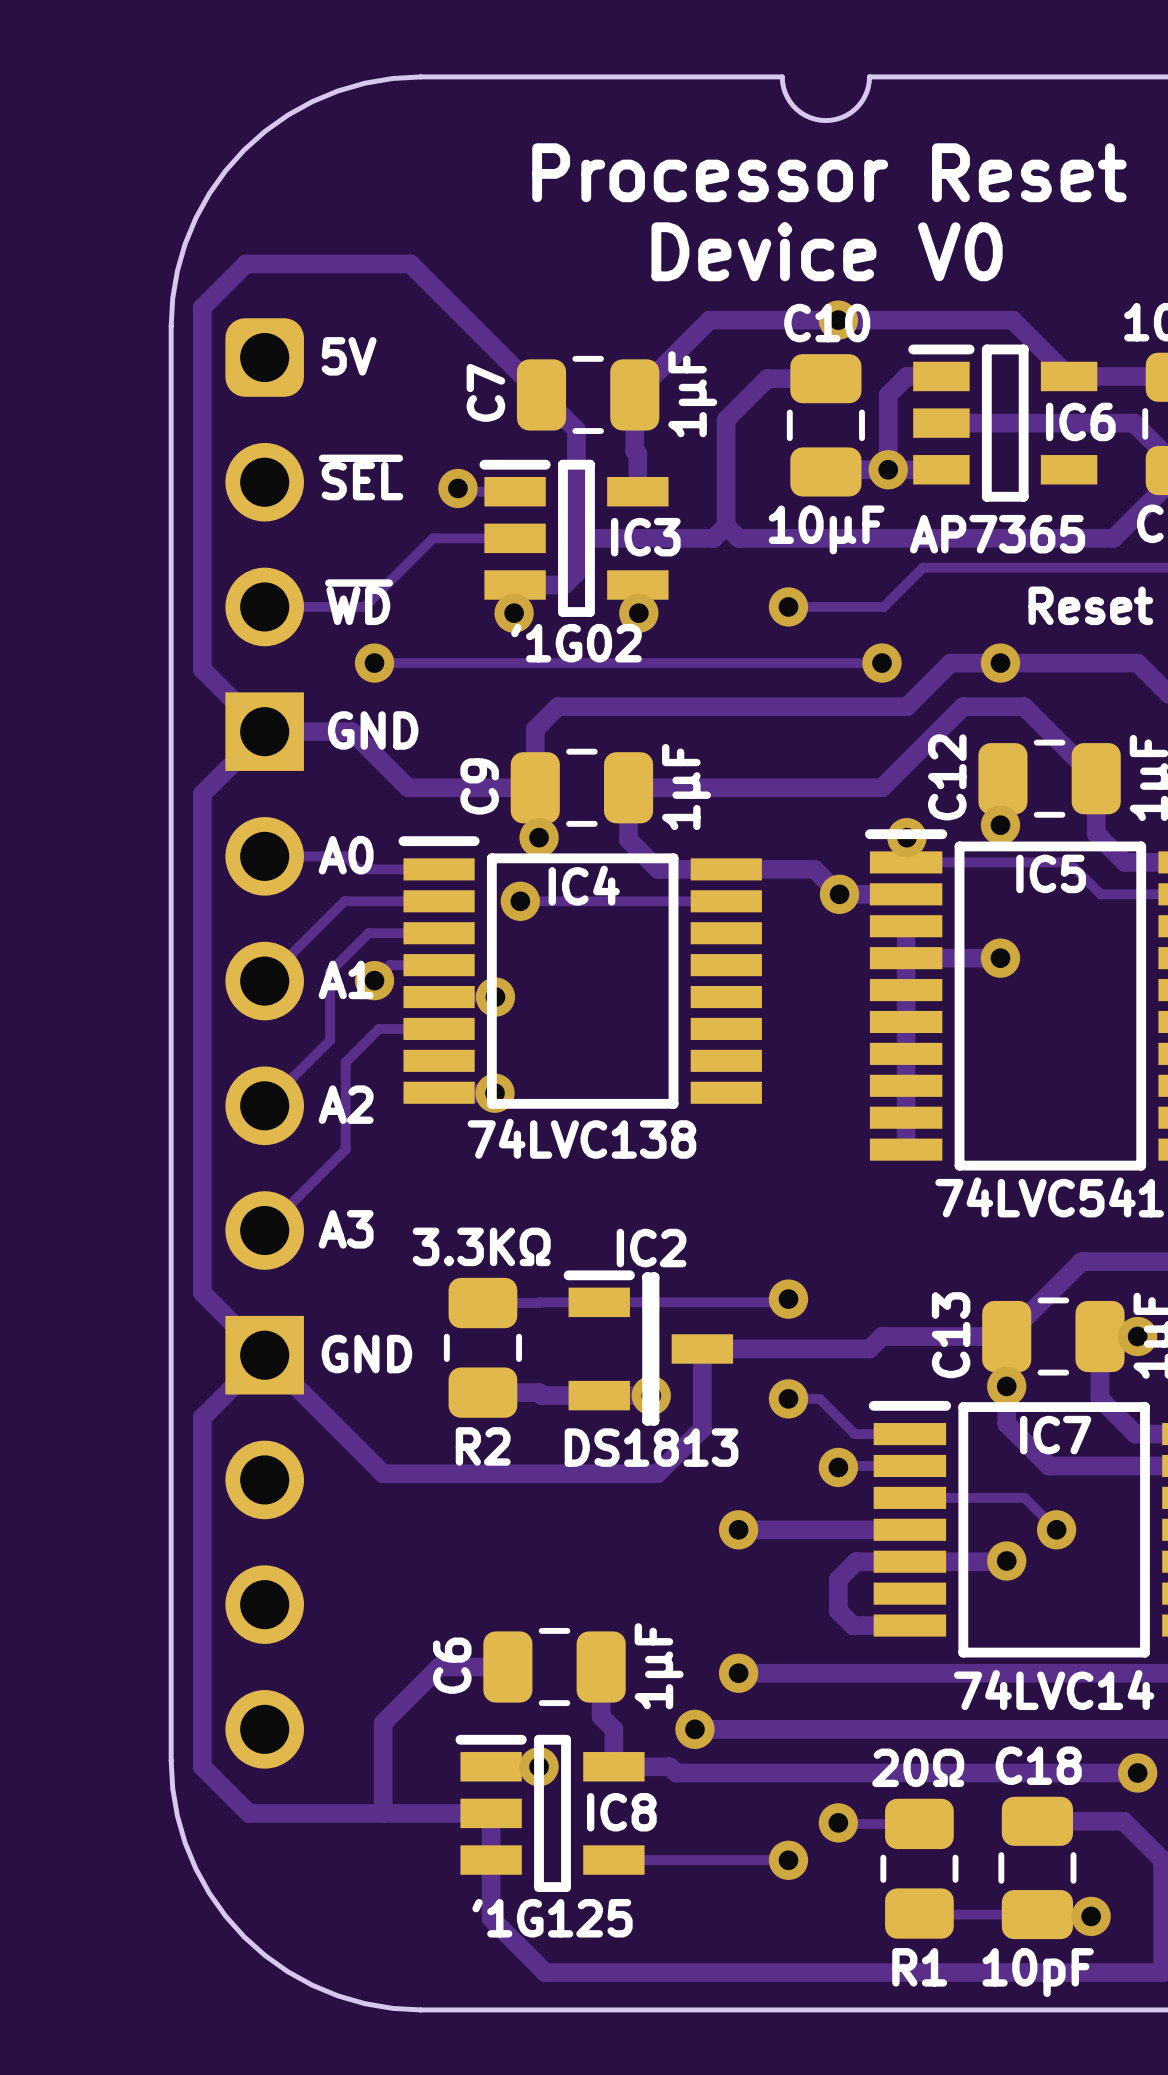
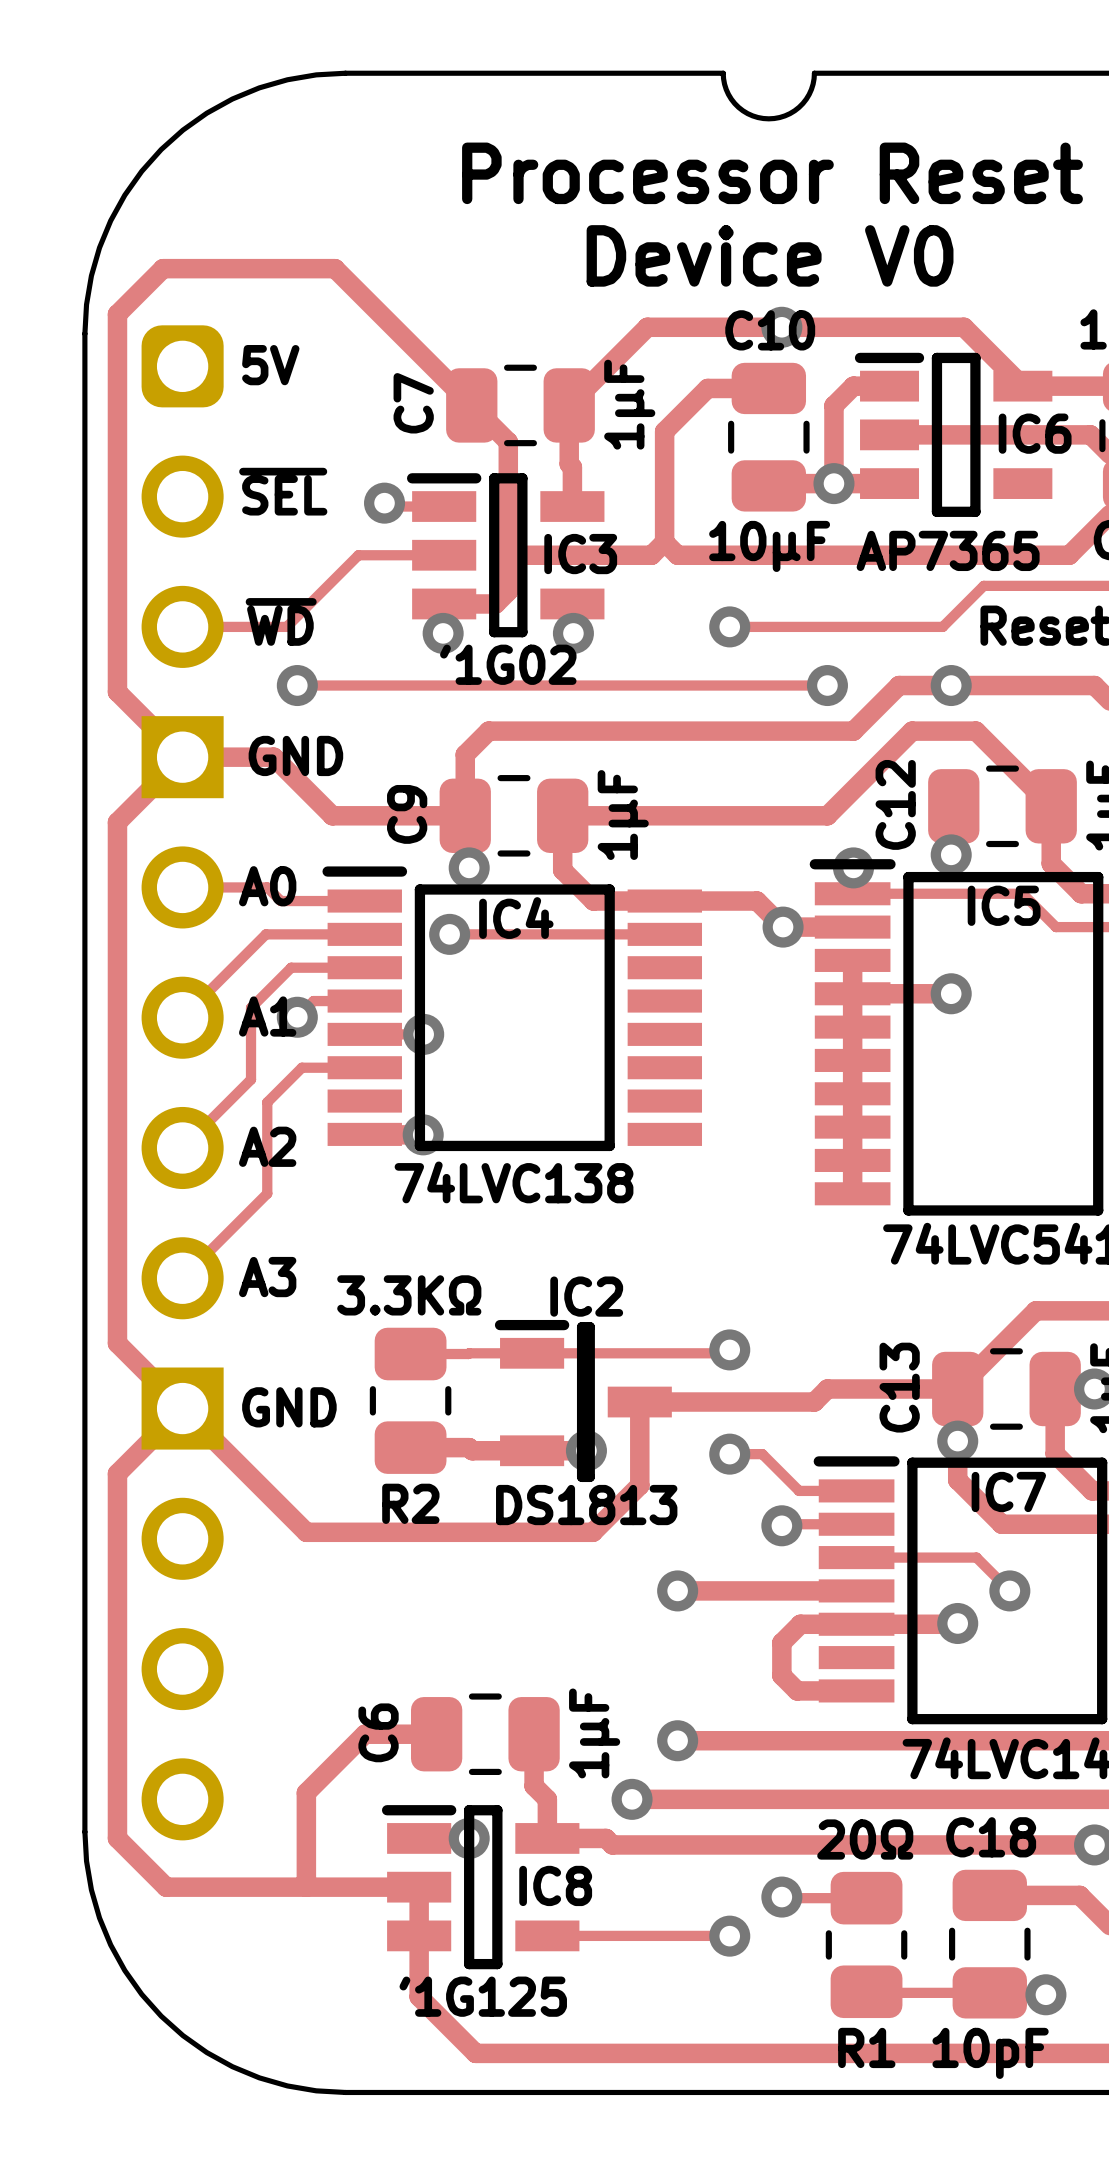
track: (1031, 567) (923, 567) (883, 606) -> (983, 585) (942, 626) (829, 626)

